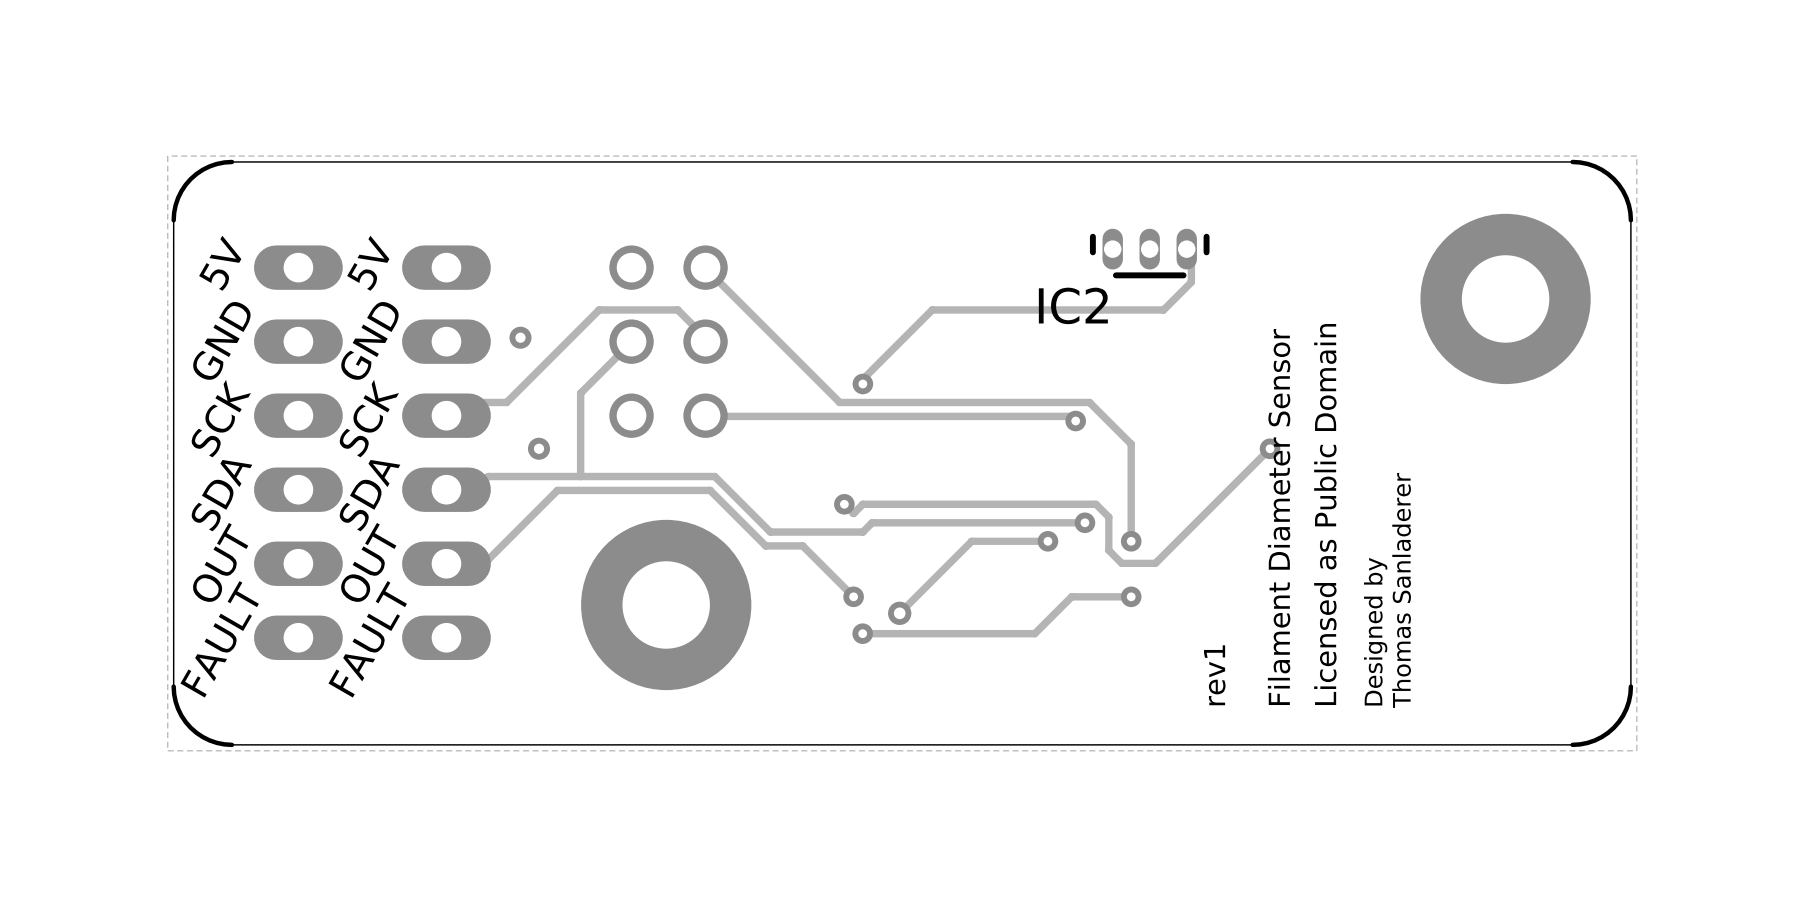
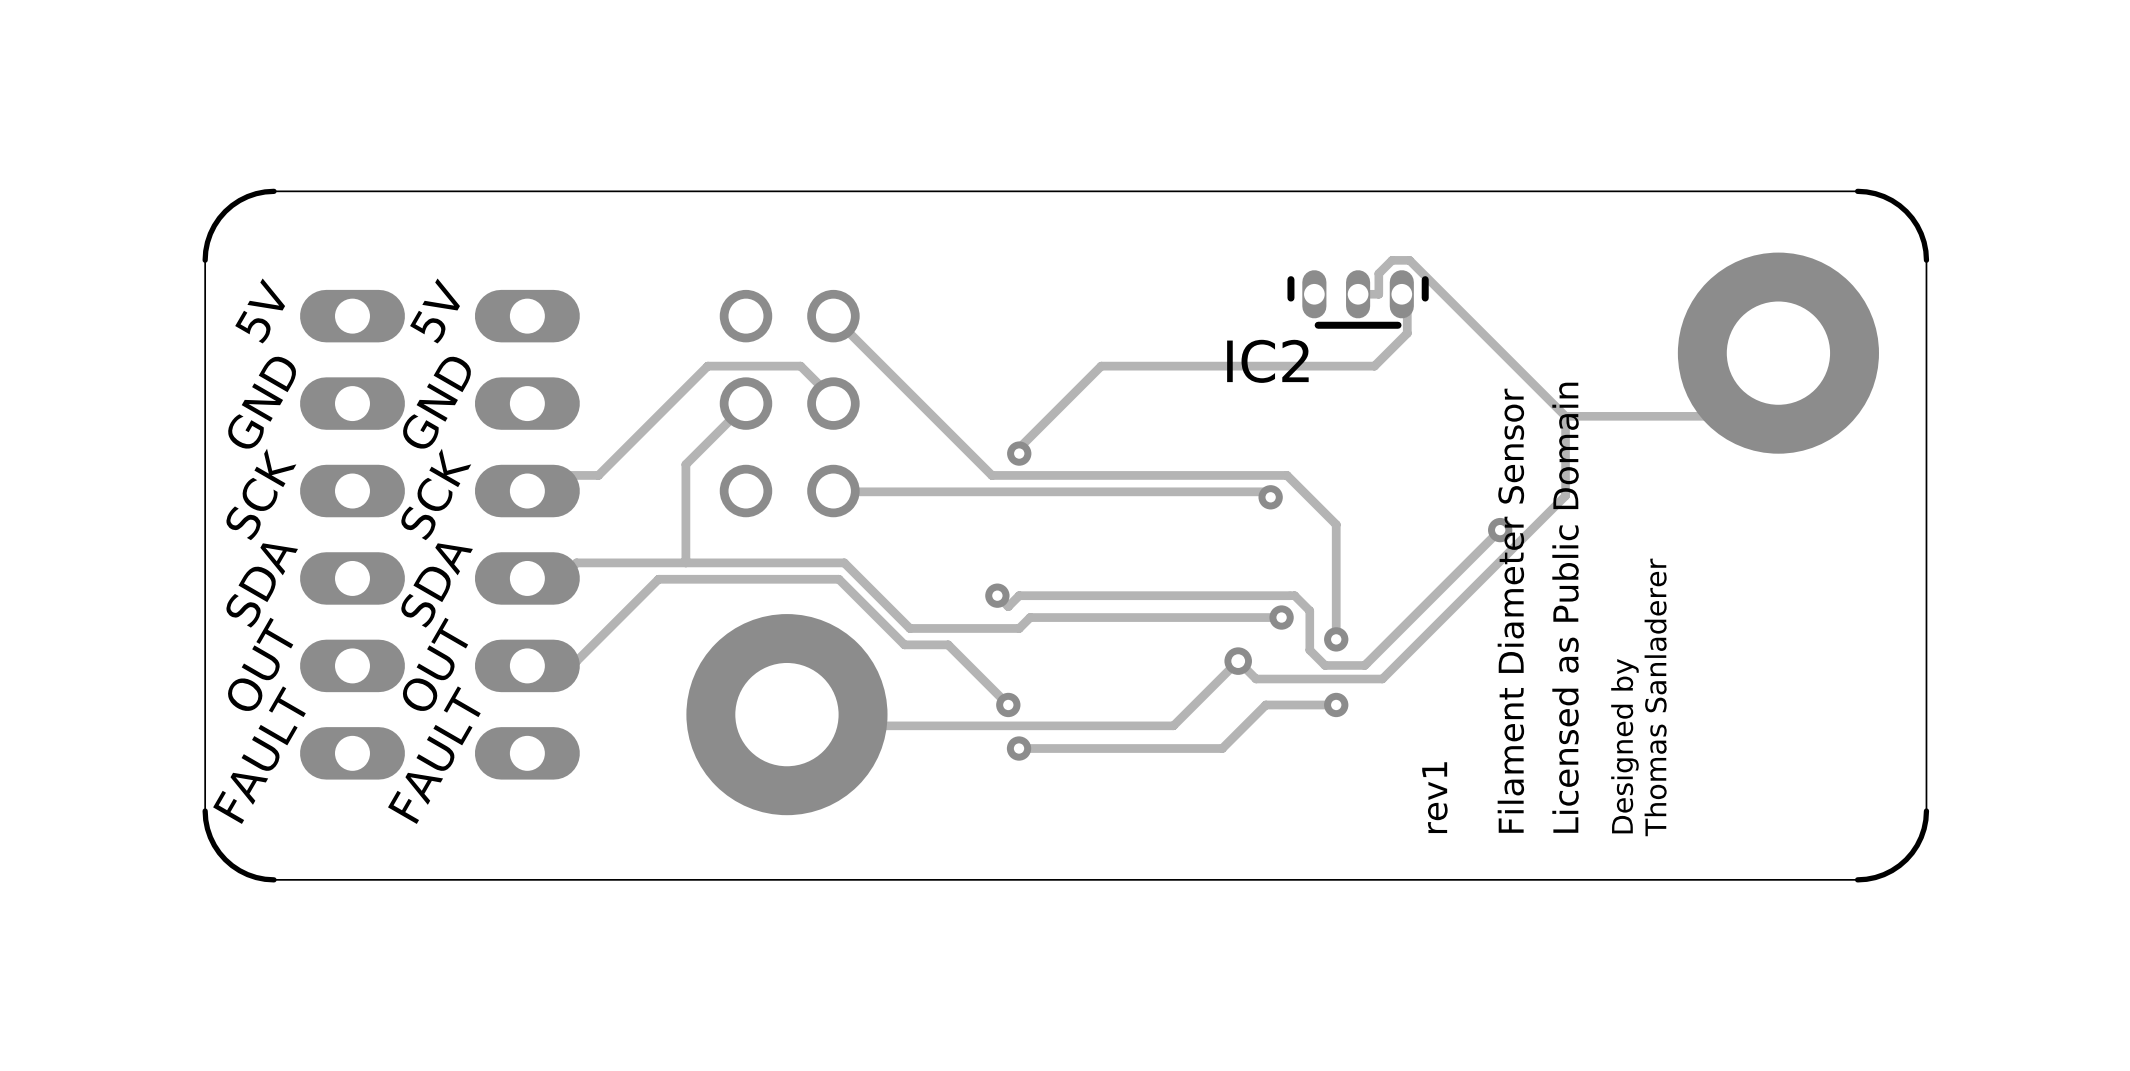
zone outline: (1636, 156) (1636, 750) (167, 750) (167, 156) (1636, 156) -> none
track: none -> (1358, 294) (1378, 294) (1378, 273) (1392, 260) (1409, 260) (1565, 416)
track: none -> (1778, 353) (1715, 416) (1565, 416)
via: (520, 337) -> none
track: none -> (1565, 416) (1565, 495) (1382, 679) (1256, 679) (1238, 661) (1173, 725) (798, 725) (786, 714)
via: (539, 448) -> none
track: (1047, 541) (971, 541) (899, 613) -> none
via: (1047, 541) -> none
via position: (899, 613) -> (1238, 661)

